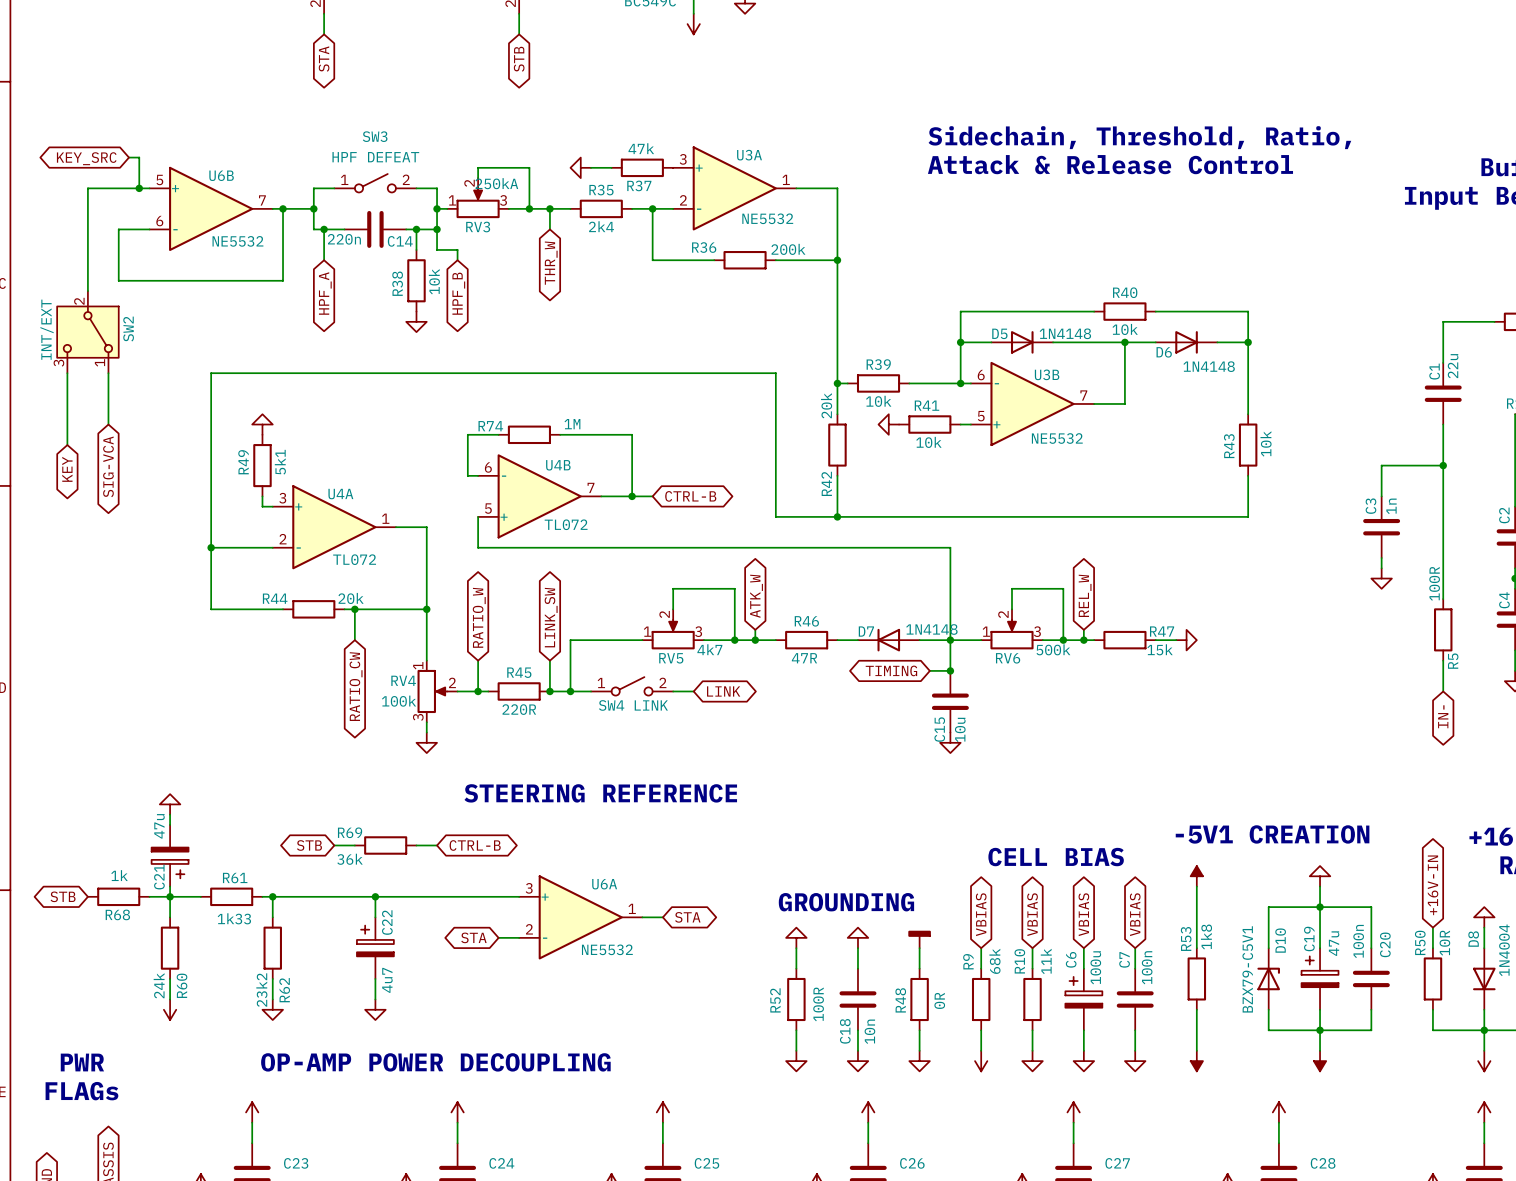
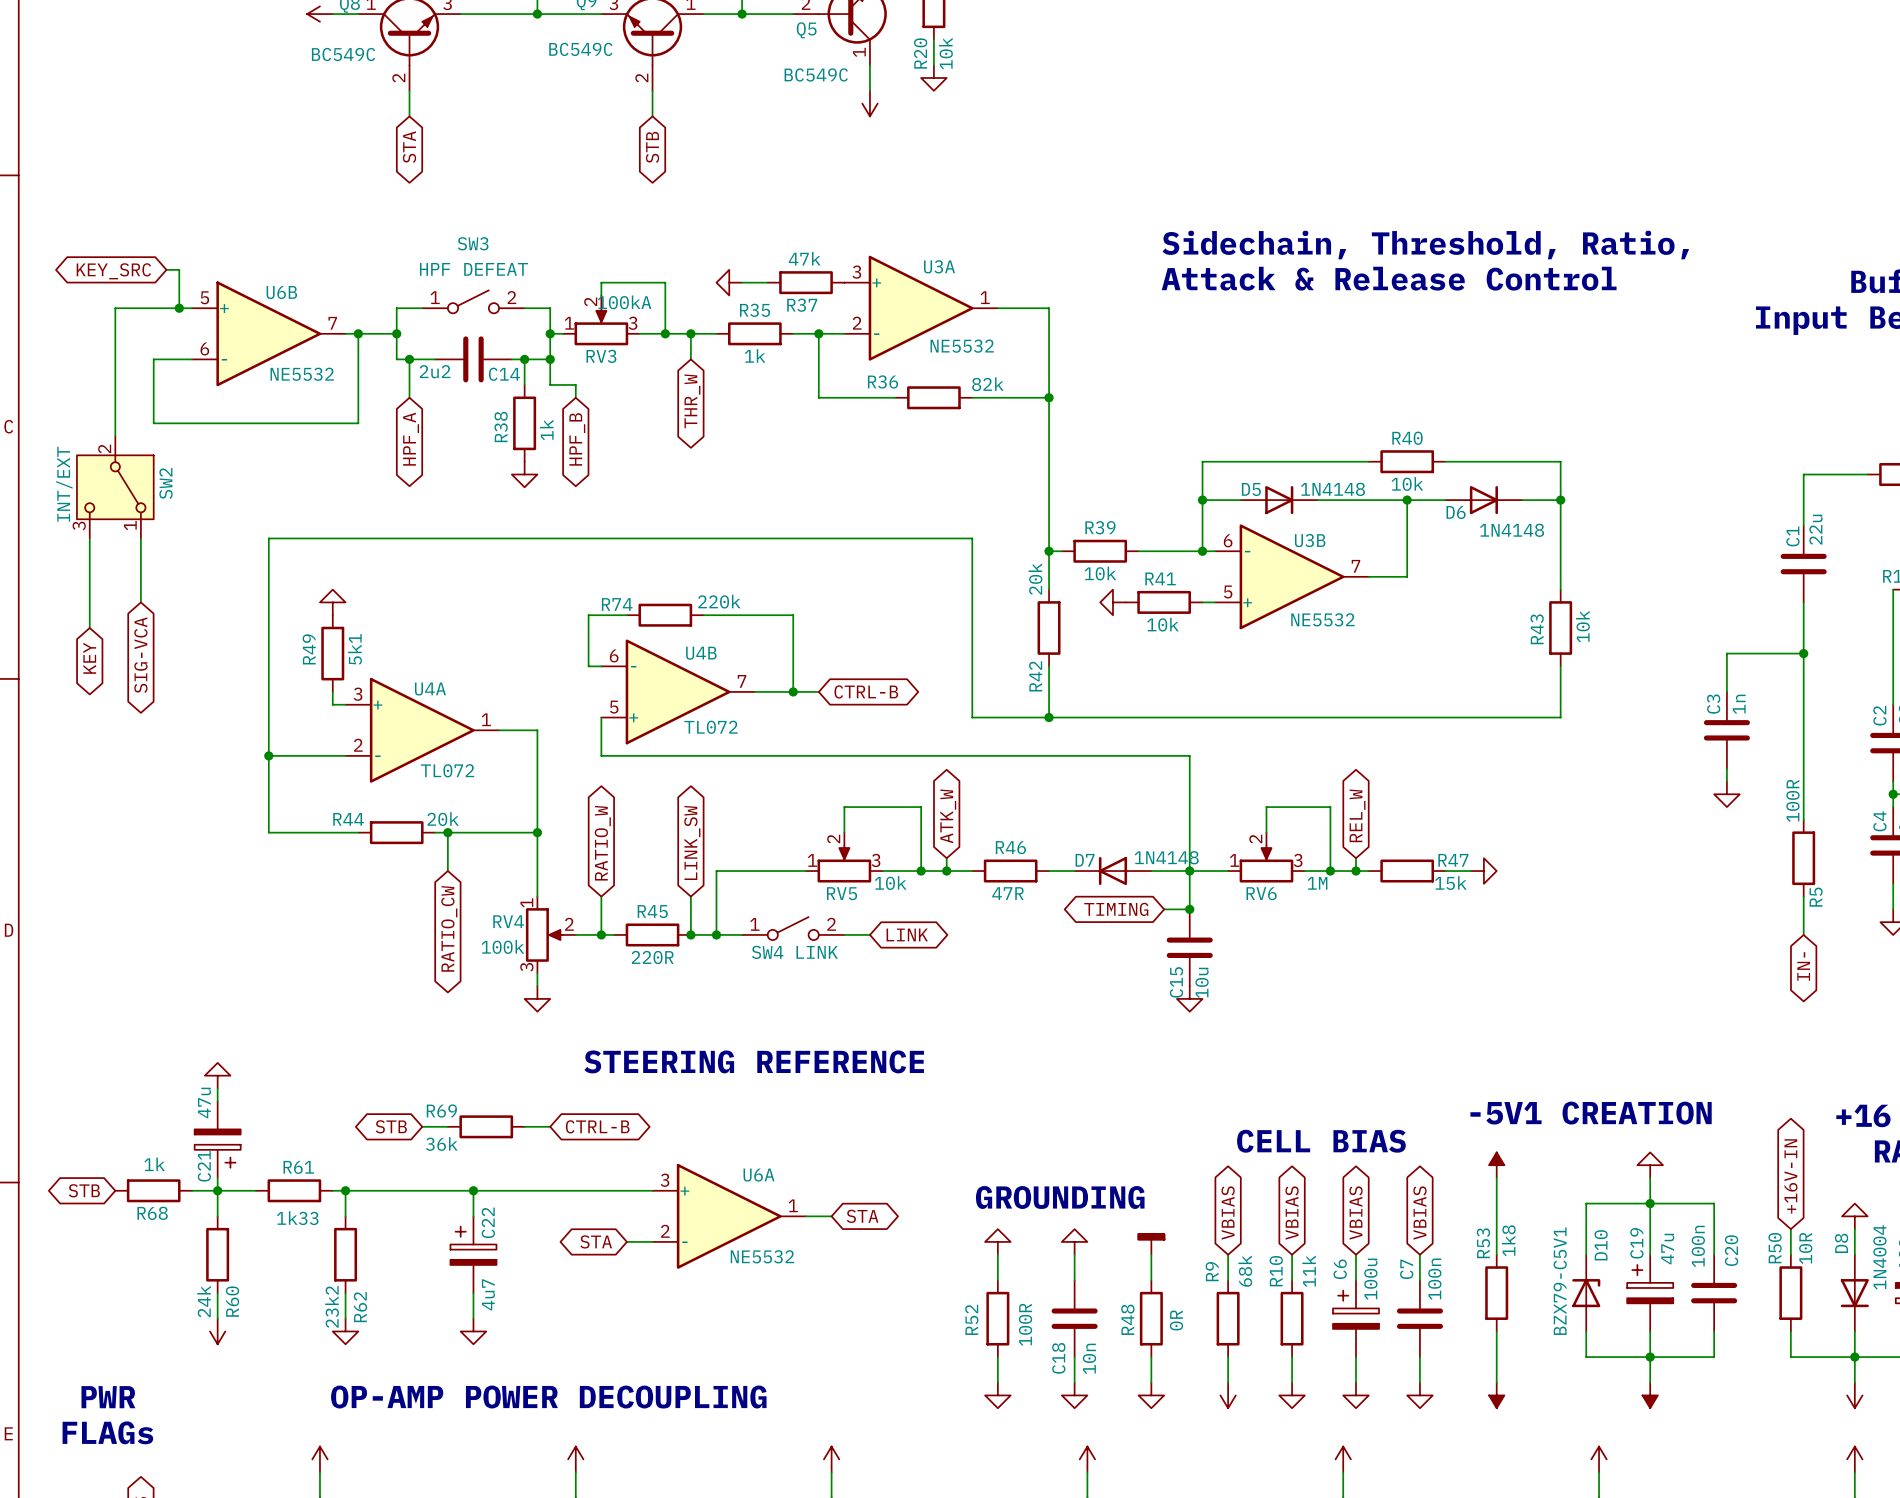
RV3 value: 250kA (496, 183) -> 100kA (624, 302)
R35 value: 2k4 (601, 226) -> 1k (755, 355)
C14 value: 220n (344, 239) -> 2u2 (435, 371)
R36 value: 200k (788, 249) -> 82k (987, 384)
R38 value: 10k (434, 281) -> 1k (546, 430)
R74 value: 1M (572, 424) -> 220k (719, 601)
RV5 value: 4k7 (709, 649) -> 10k (890, 883)
RV6 value: 500k (1053, 649) -> 1M (1317, 883)

